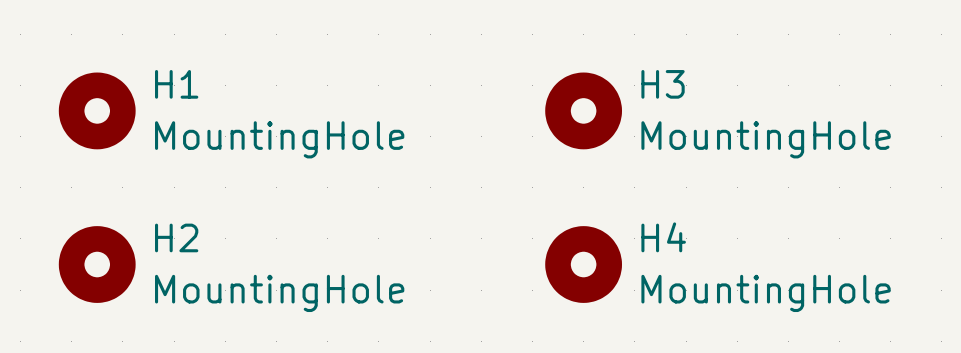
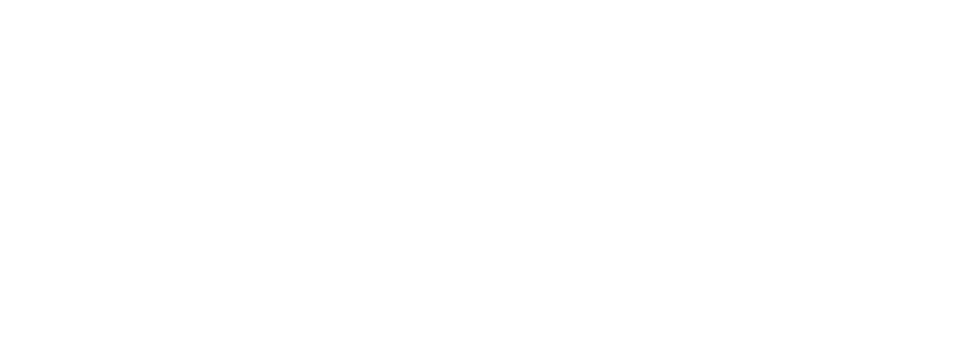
H1: MountingHole (97, 110) -> none
H3: MountingHole (583, 110) -> none
H2: MountingHole (97, 264) -> none
H4: MountingHole (583, 264) -> none

